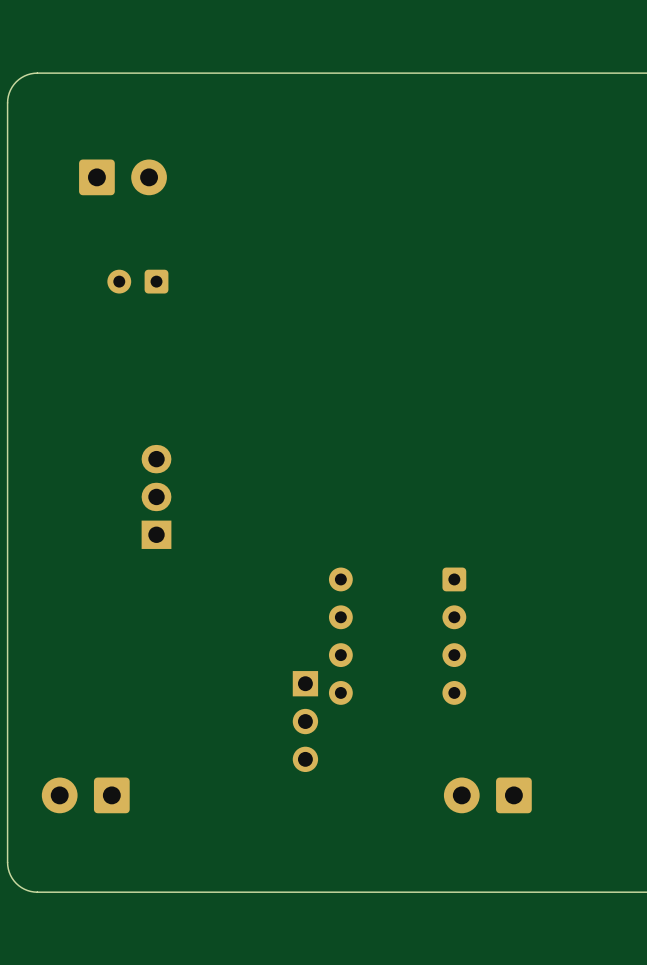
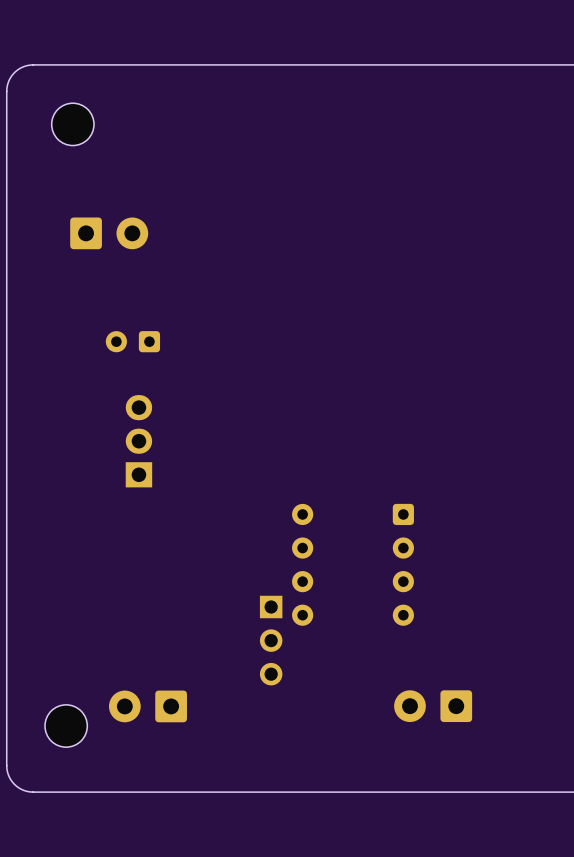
part: none -> (72, 124)
part position: (123, 177) -> (109, 233)
part position: (137, 281) -> (132, 341)
part position: (85, 795) -> (147, 706)
part: none -> (66, 726)

